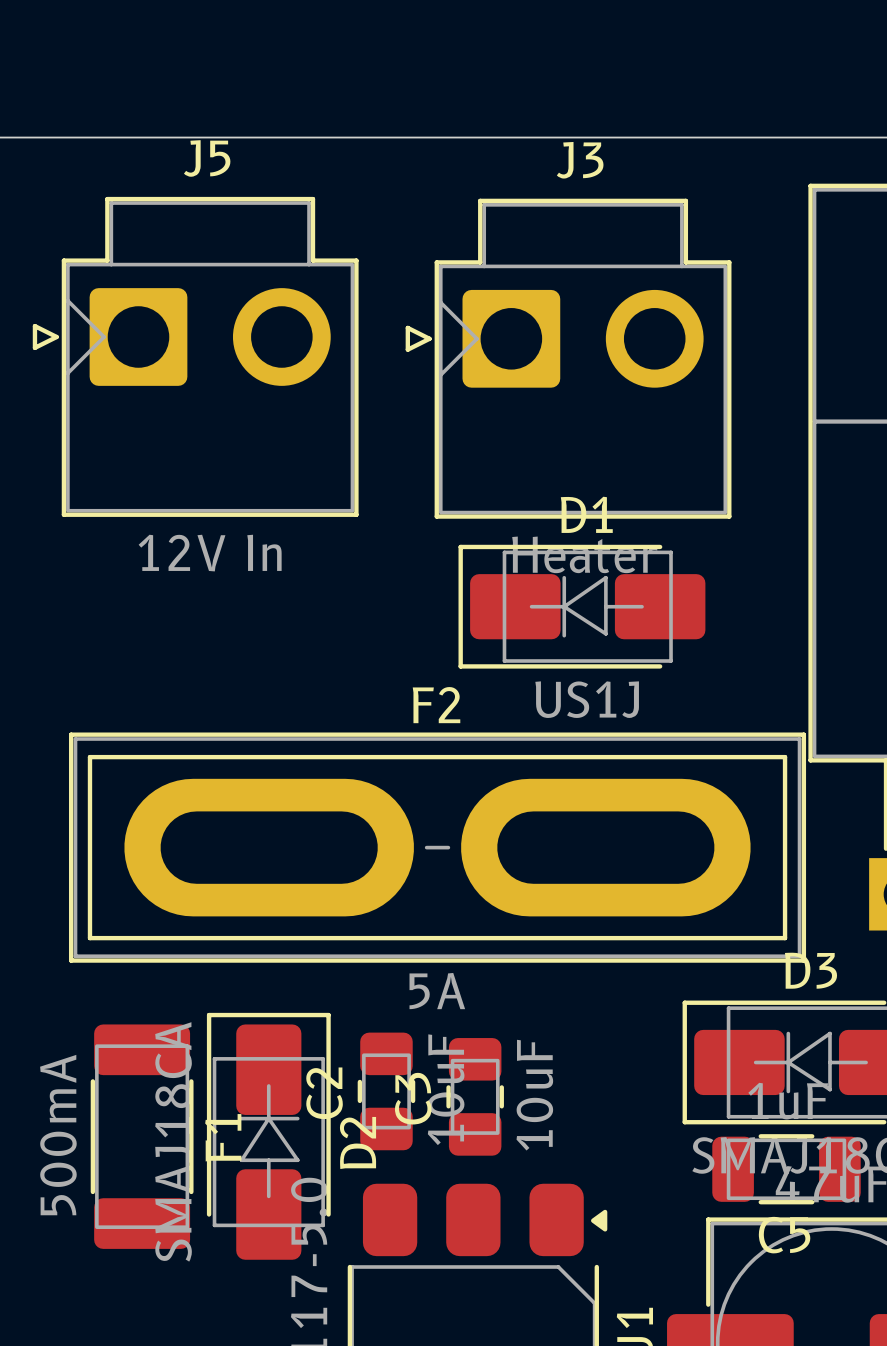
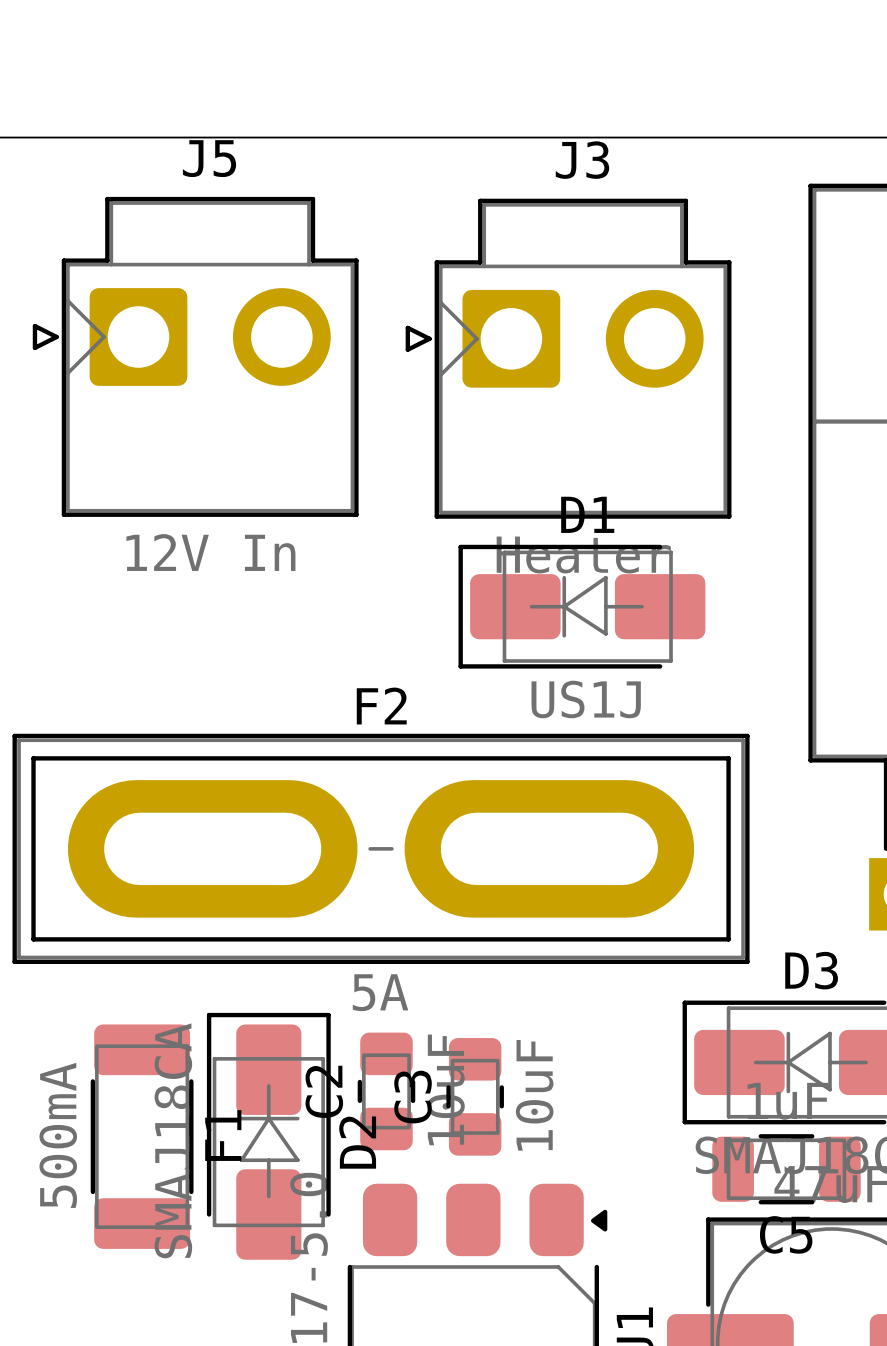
F2 position: (437, 847) -> (381, 848)

